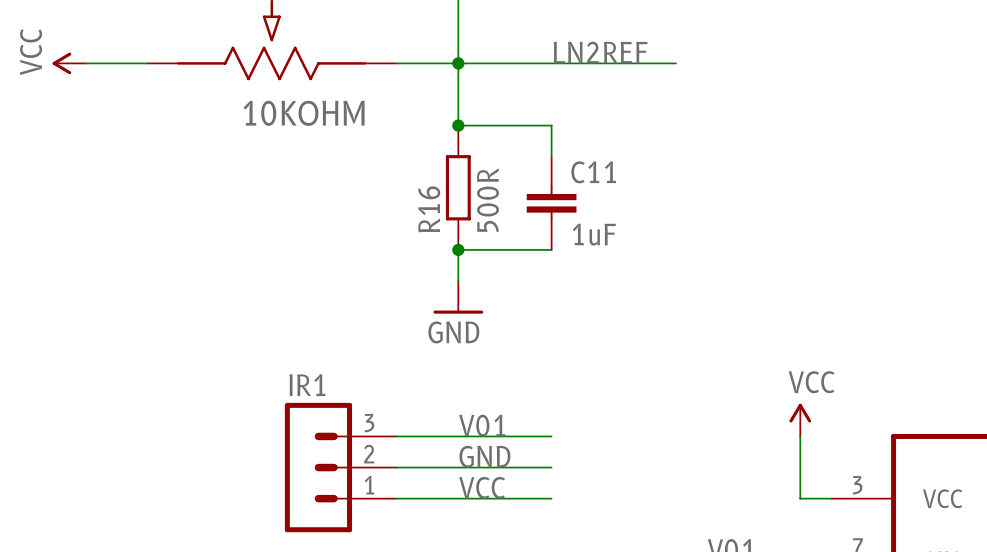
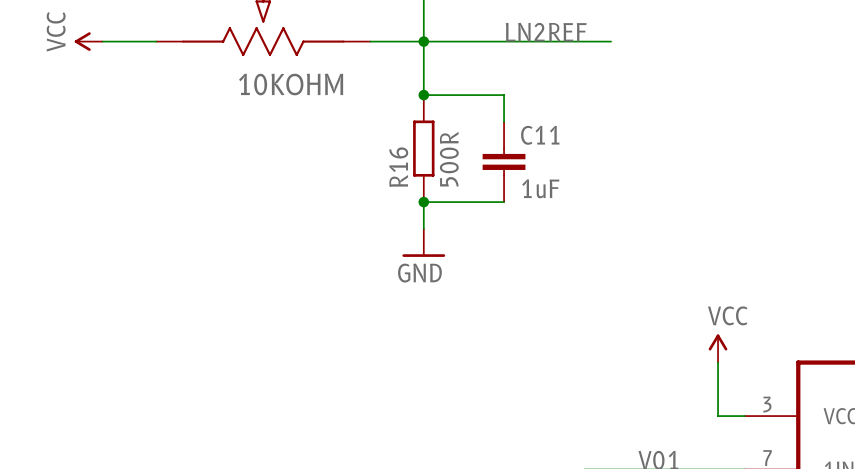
label: V01 (482, 425) -> none
wire: (396, 436) (551, 436) -> none
label: GND (484, 456) -> none
IR1: (340, 467) -> none
wire: (396, 467) (551, 467) -> none
label: VCC (482, 487) -> none
wire: (396, 498) (551, 498) -> none

